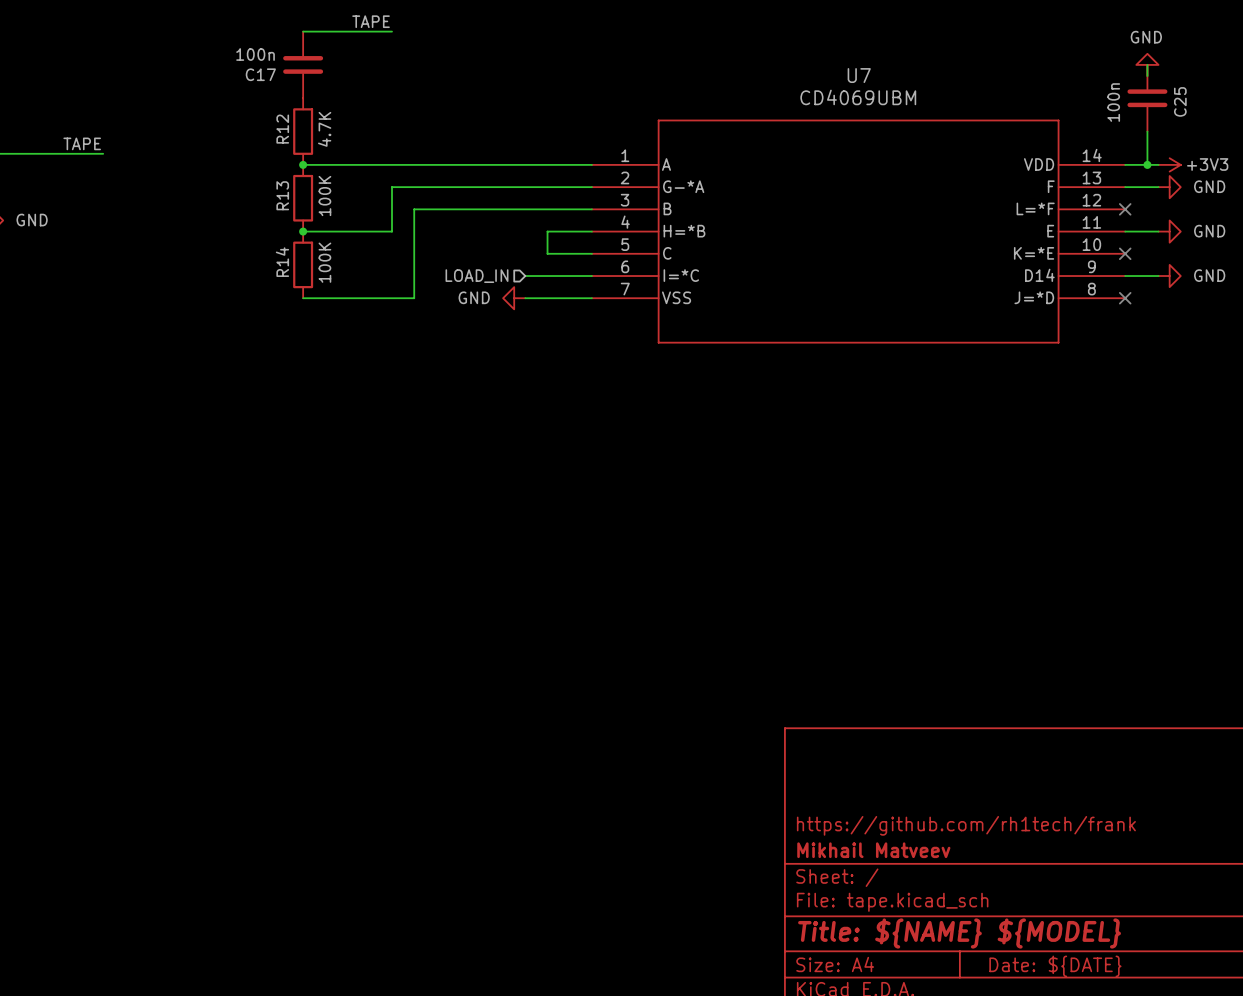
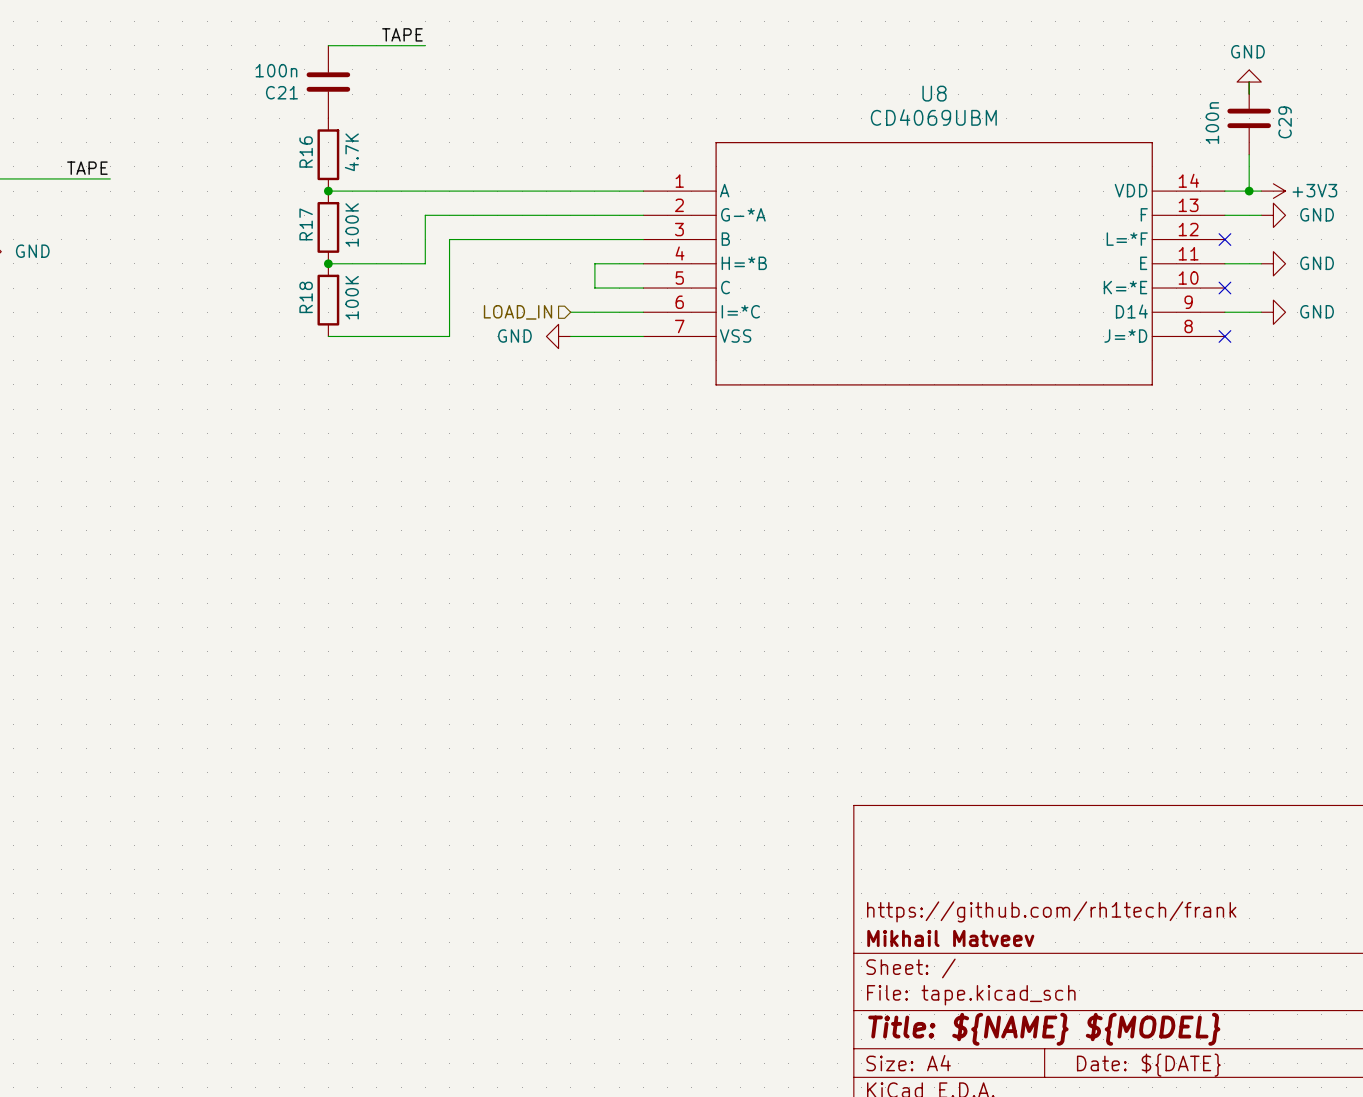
C17 name: C17 (260, 74) -> C21 (281, 92)
U7 name: U7 (859, 75) -> U8 (934, 93)
C25 name: C25 (1180, 101) -> C29 (1285, 122)
R12 name: R12 (282, 129) -> R16 (306, 152)
R13 name: R13 (282, 195) -> R17 (306, 224)
R14 name: R14 (282, 262) -> R18 (306, 297)

